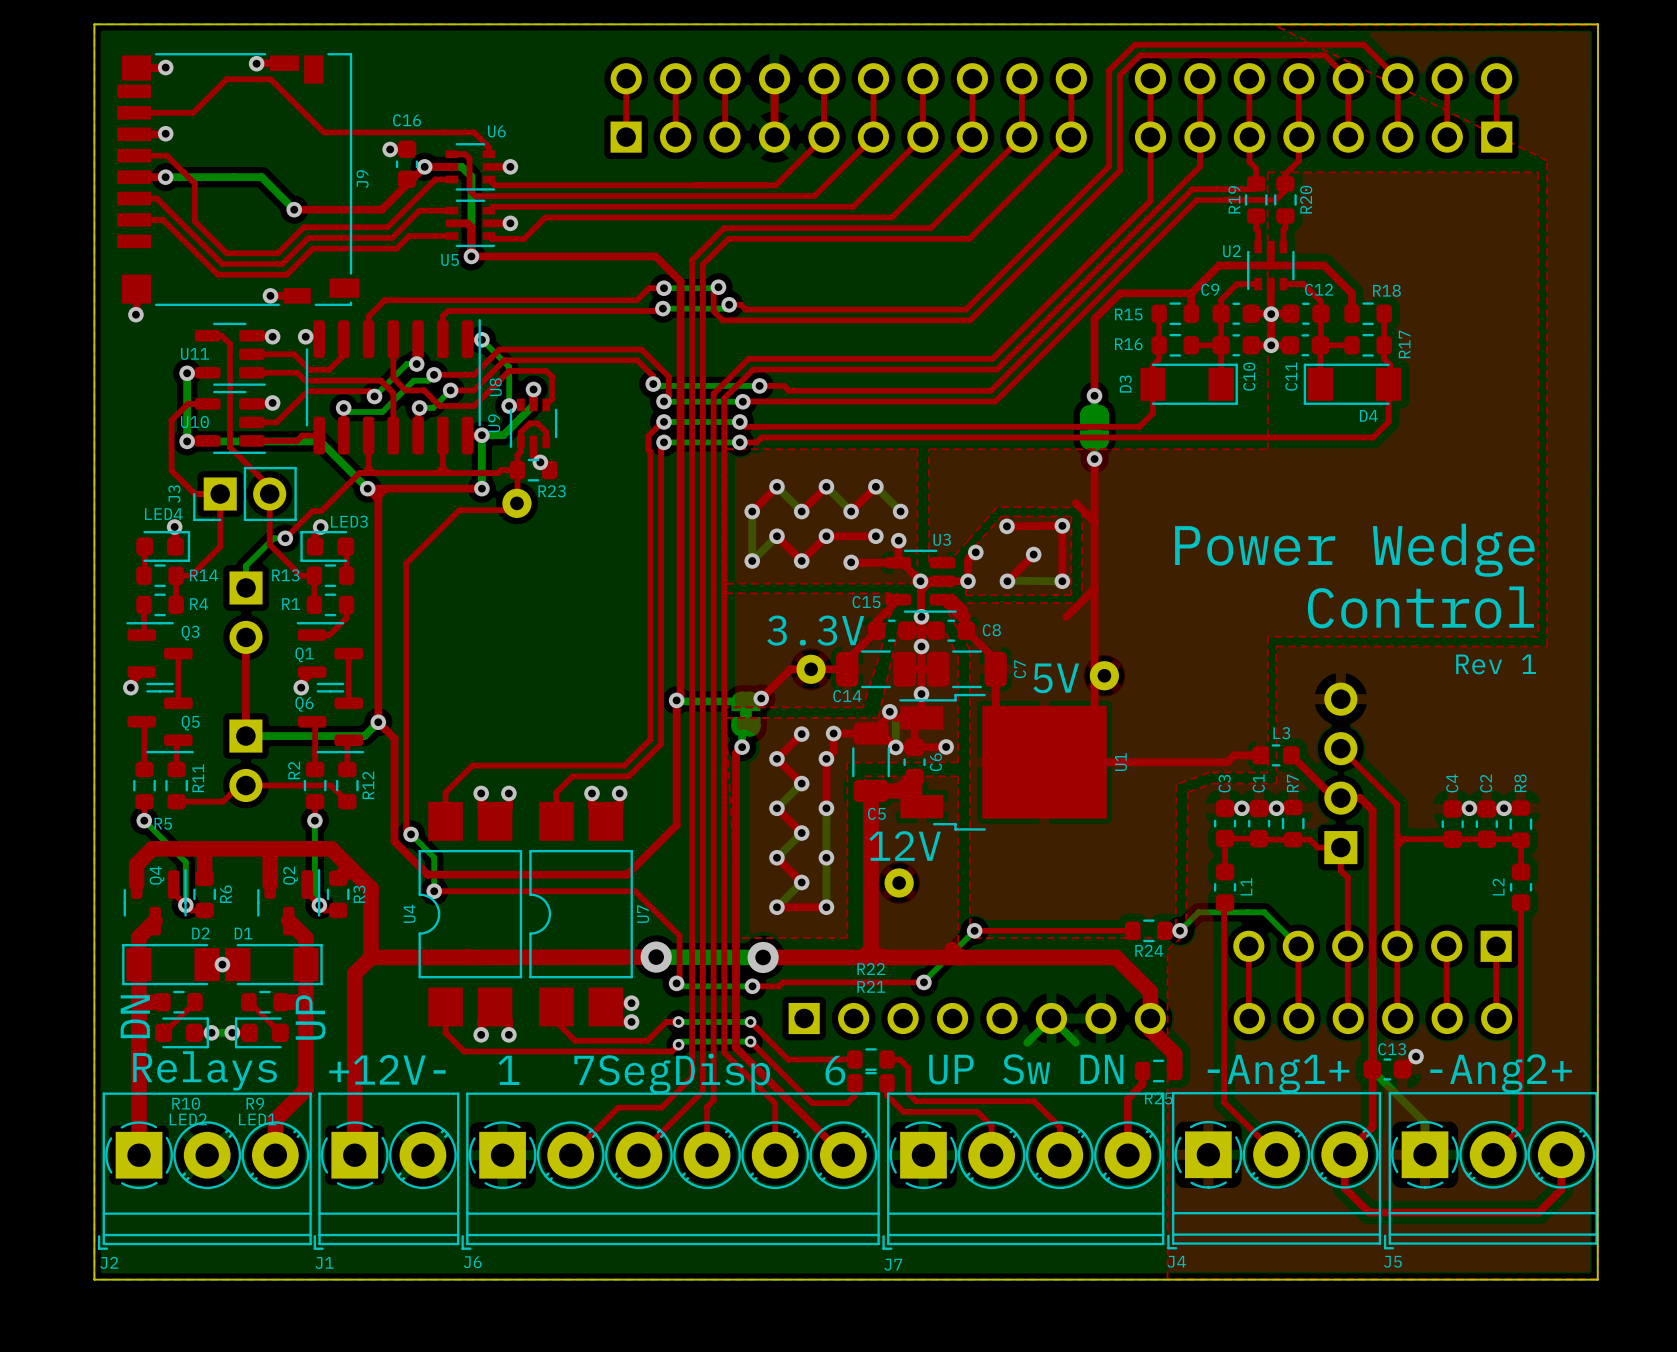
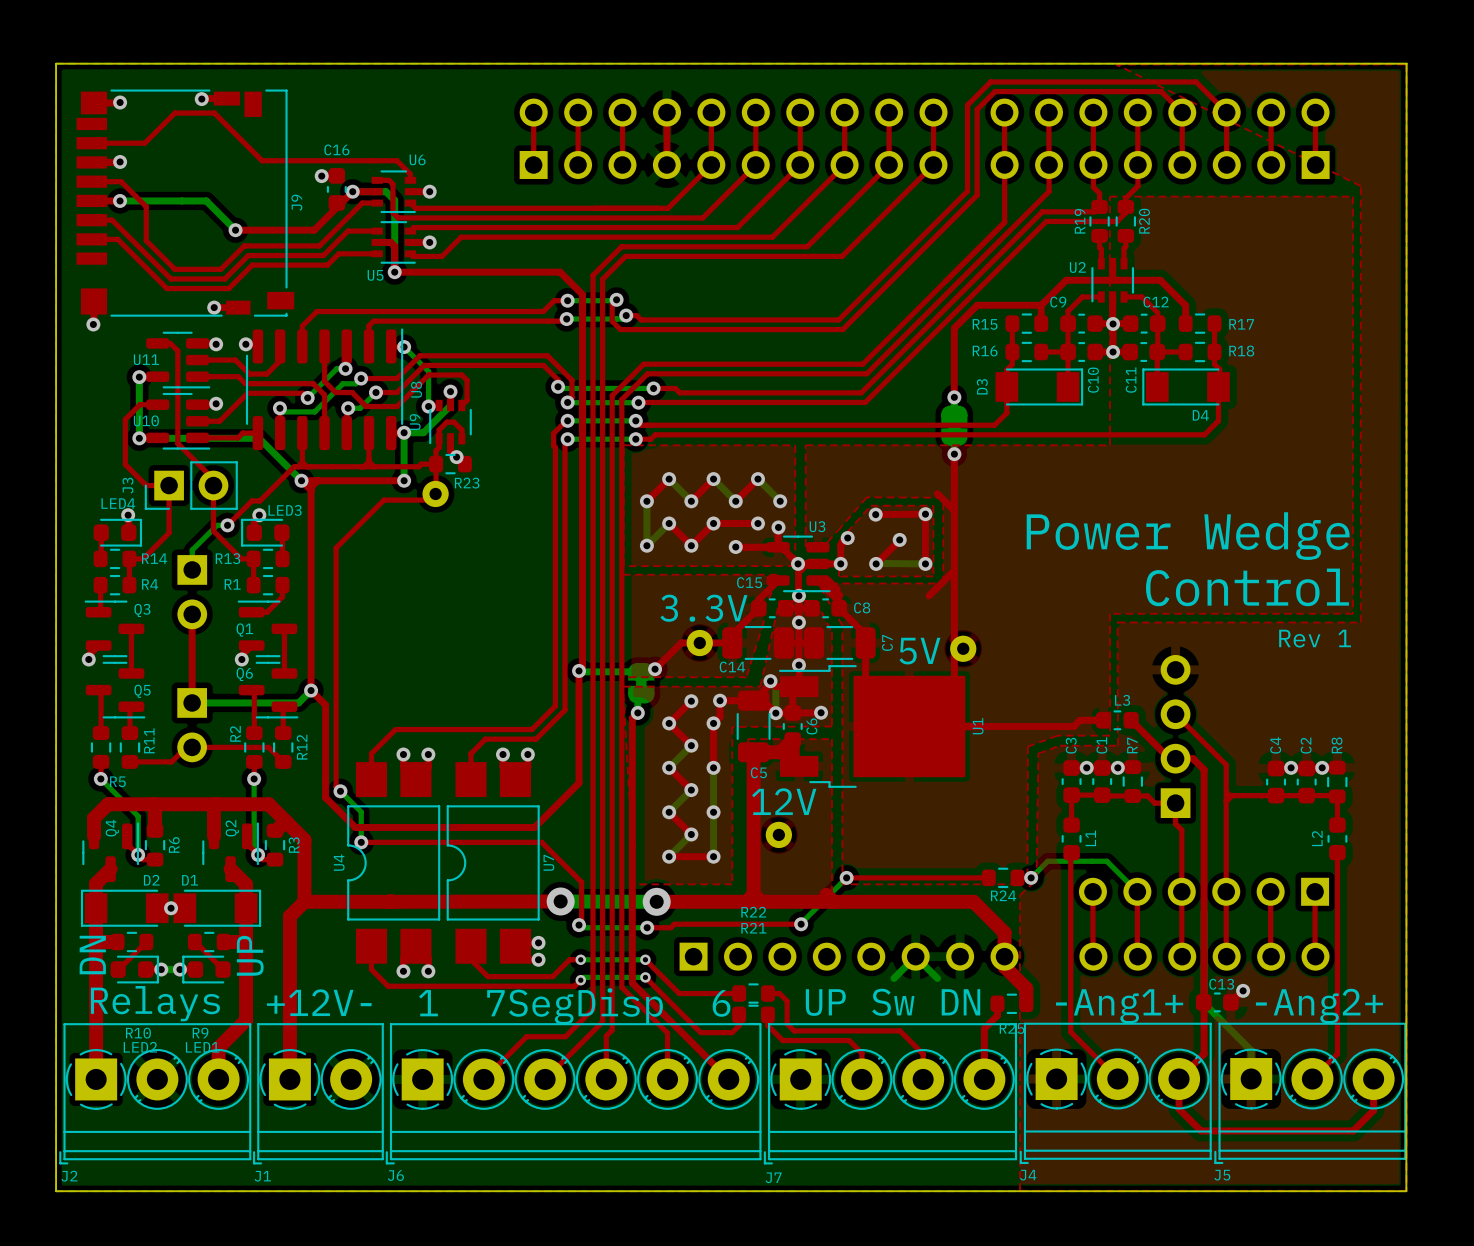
R18 name position: R18 (1386, 290) -> R18 (1241, 351)
R17 name rotation: 0° (1404, 344) -> 90° clockwise (1241, 324)

